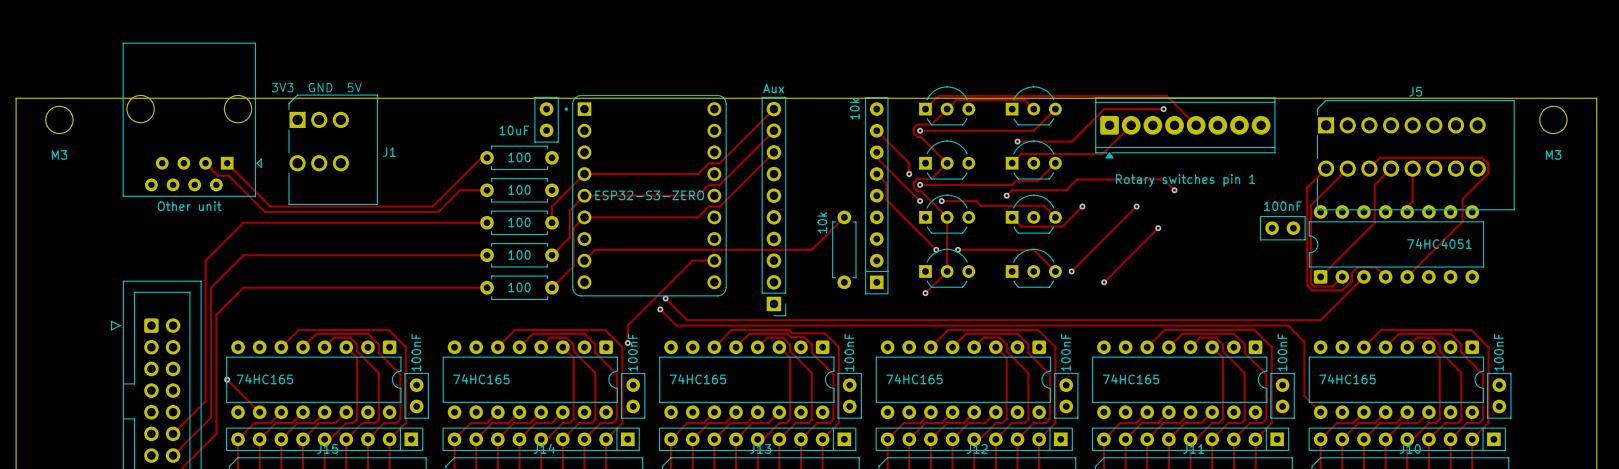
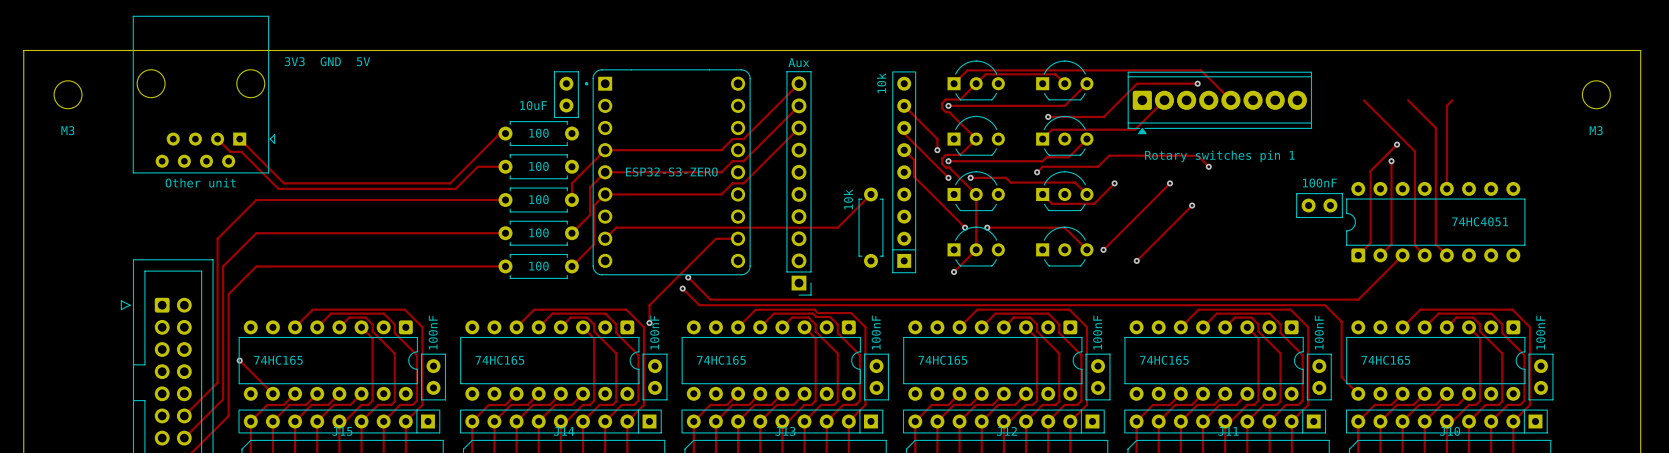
board edge: (16, 98) (1596, 98) -> (23, 72) (23, 50) (1640, 50) (1640, 72)
J1: (333, 149) -> none
J5: (1415, 155) -> none
track: (1326, 168) (1307, 187) (1307, 285) (1312, 290) (1342, 290) (1351, 280) (1351, 272) (1357, 267) (1376, 267) -> (1363, 100) (1414, 151) (1414, 245)
track: (1347, 168) (1311, 205) (1311, 283) (1313, 286) (1332, 286) (1342, 276) -> (1391, 161) (1391, 244) (1380, 255)
via: none -> (1397, 144)
track: (1369, 168) (1380, 157) (1482, 157) (1488, 164) (1488, 173) (1462, 199) (1462, 221) (1407, 276) -> (1408, 100) (1435, 128) (1435, 244) (1446, 255)
track: (1391, 168) (1374, 184) (1374, 222) (1332, 264) -> (1397, 144) (1370, 171) (1370, 243)
track: (1412, 168) (1412, 201) (1407, 206) -> (1452, 100) (1446, 105) (1446, 183)
via: none -> (1391, 161)

